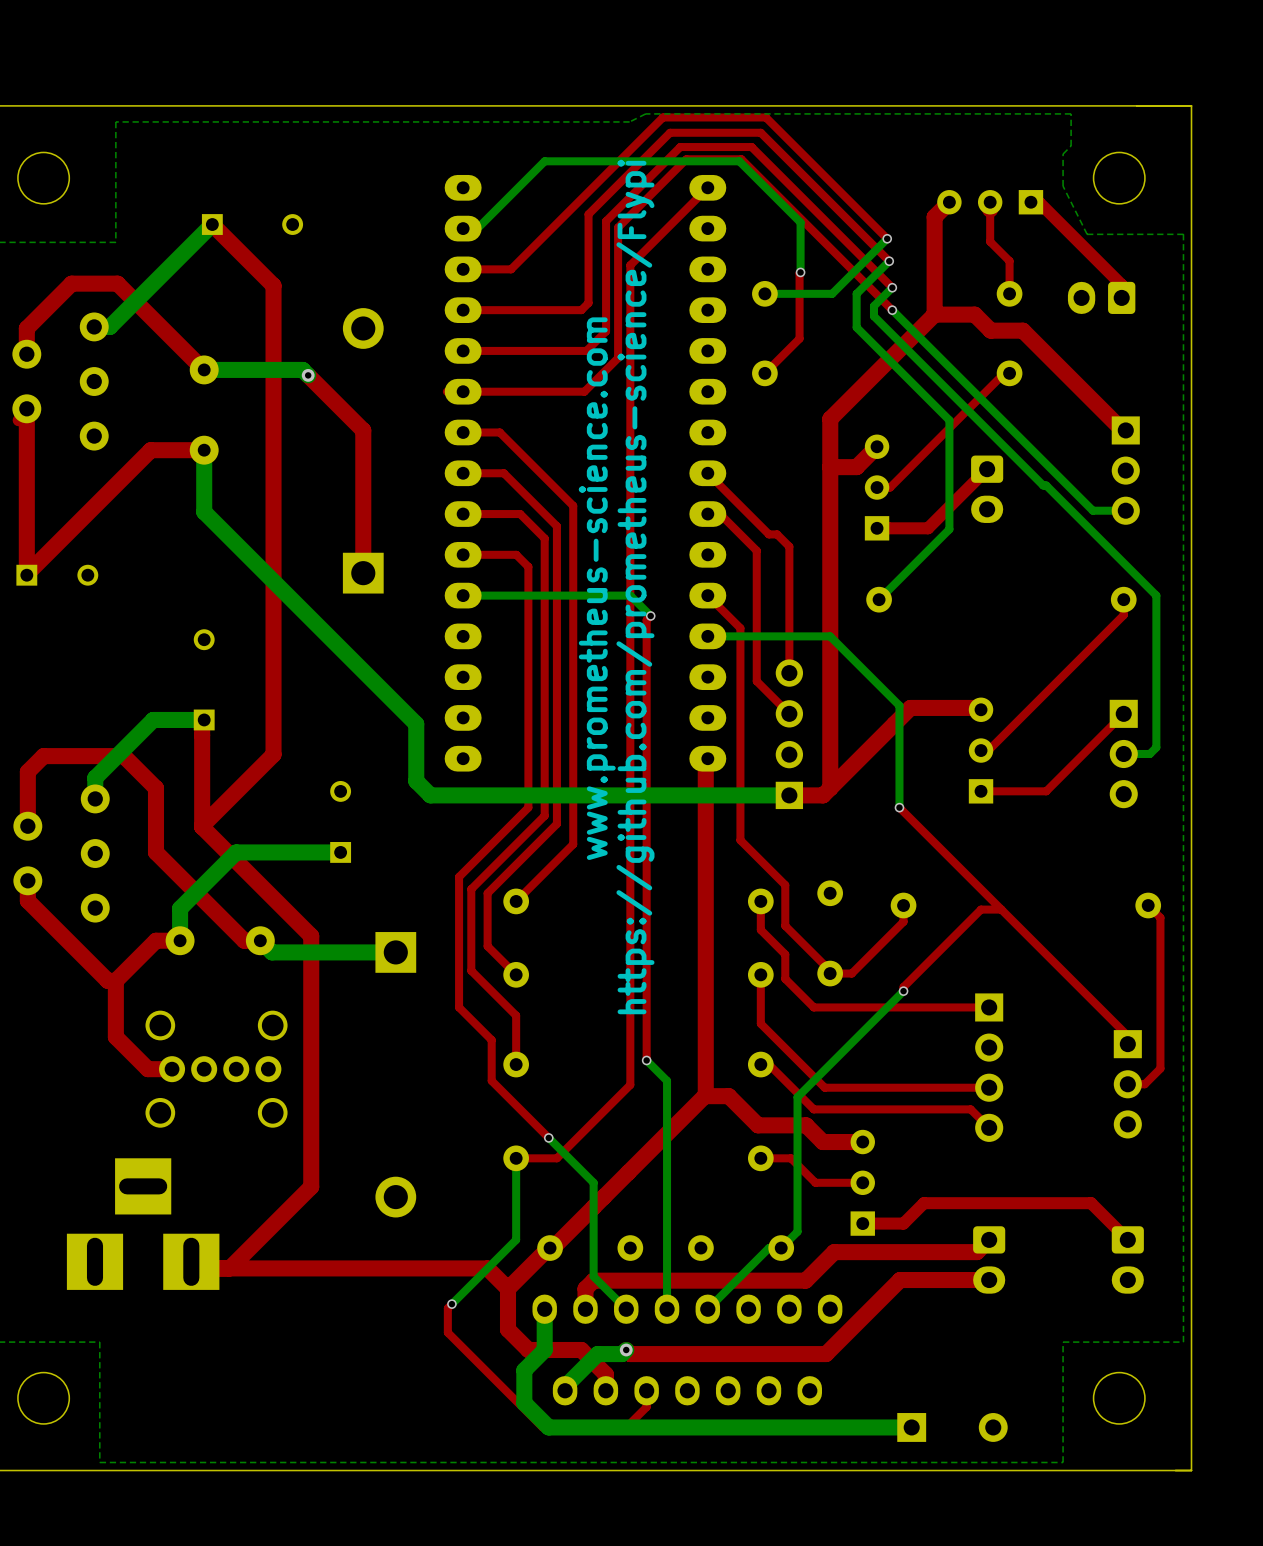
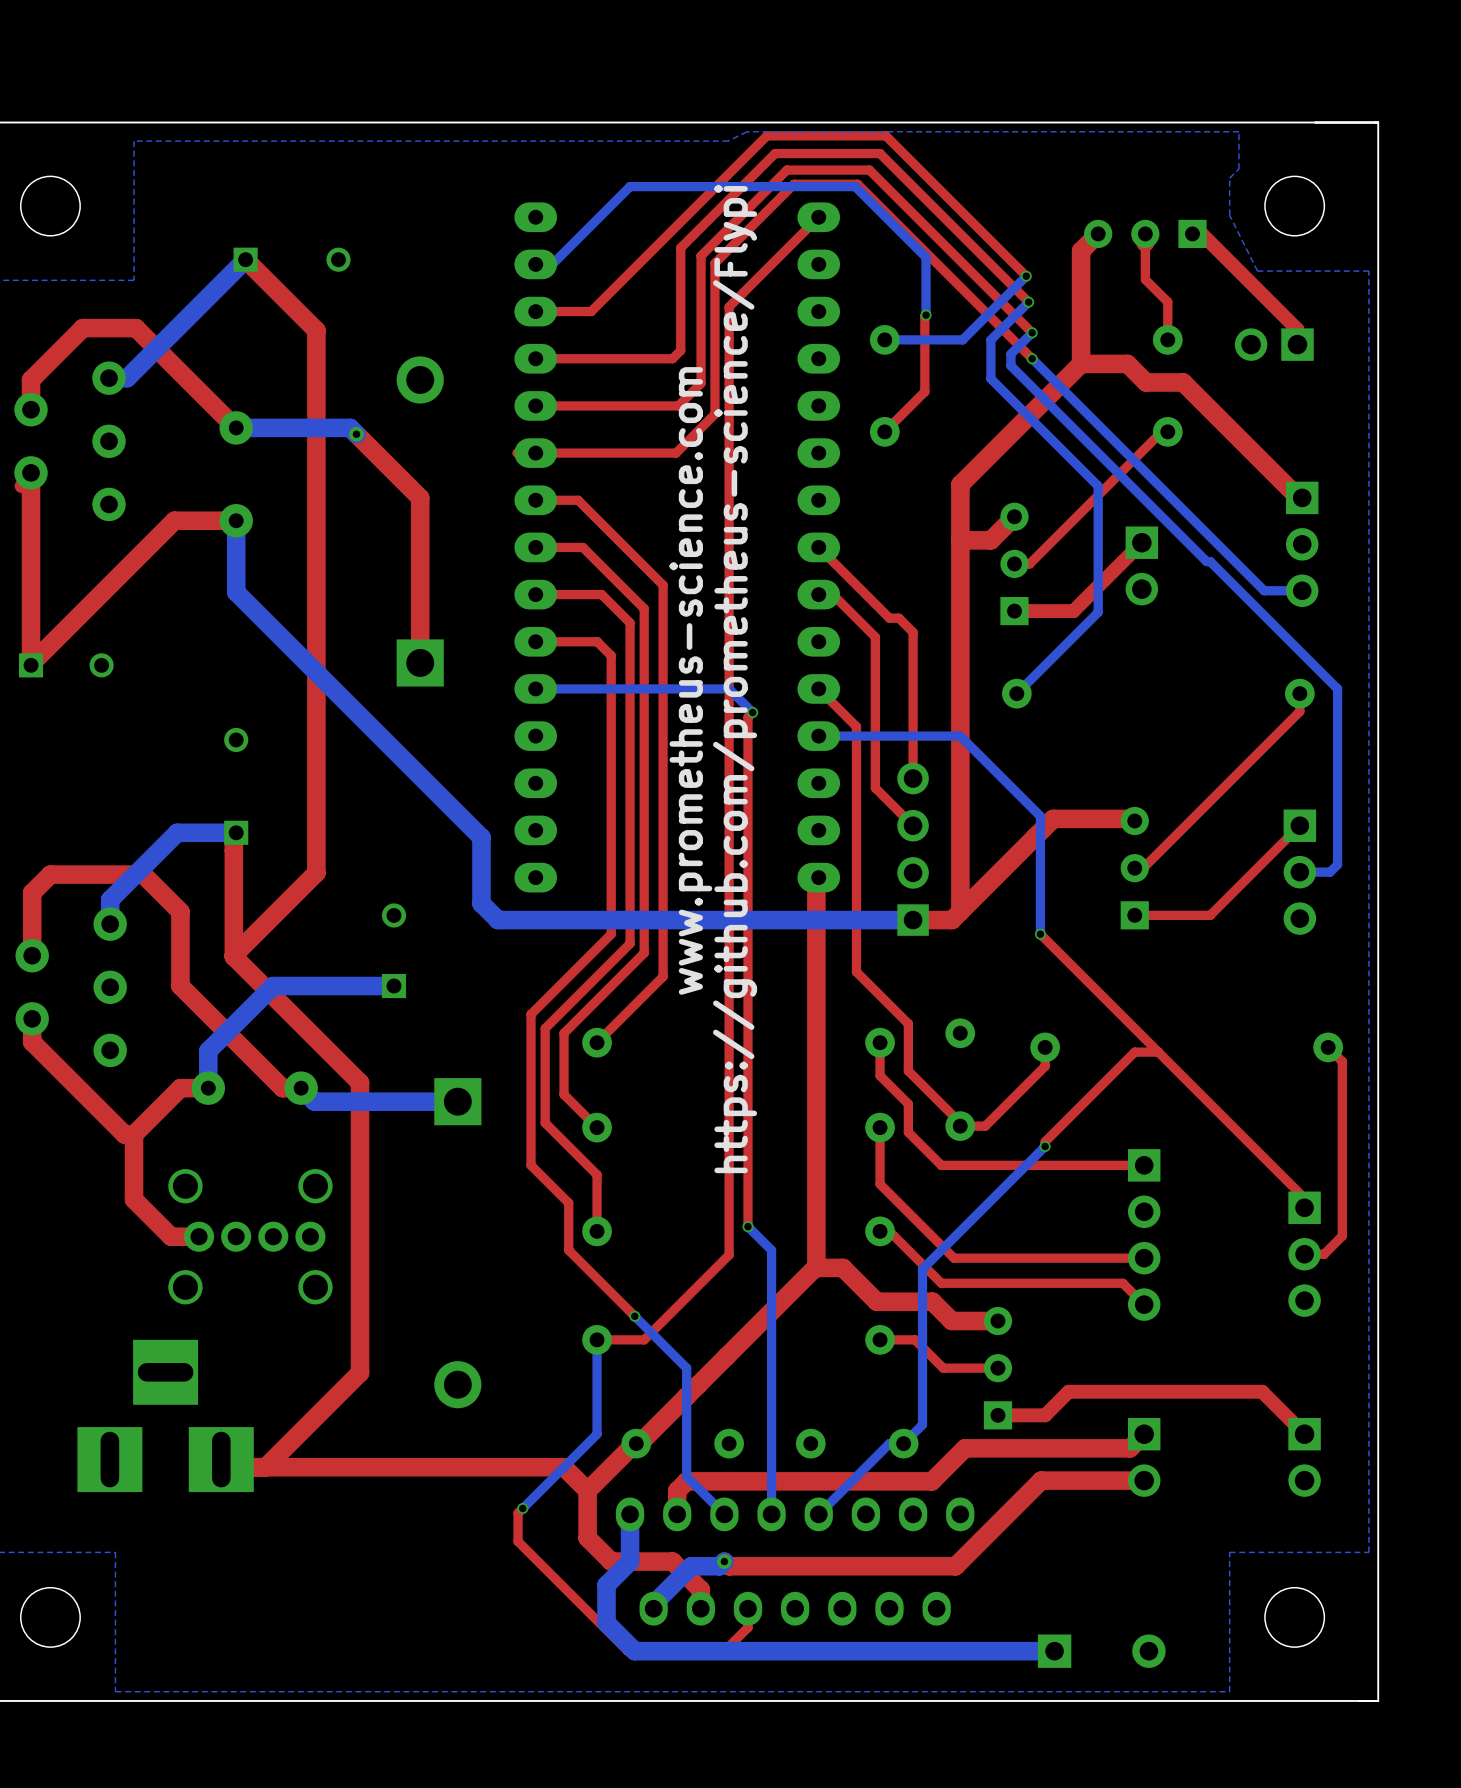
part footprint: [1067, 281, 1136, 314] -> [1234, 328, 1314, 361]
part footprint: [971, 455, 1004, 523] -> [1125, 526, 1159, 606]
part footprint: [973, 1226, 1006, 1294] -> [1127, 1417, 1161, 1497]
part footprint: [1111, 1226, 1144, 1294] -> [1288, 1417, 1321, 1497]

